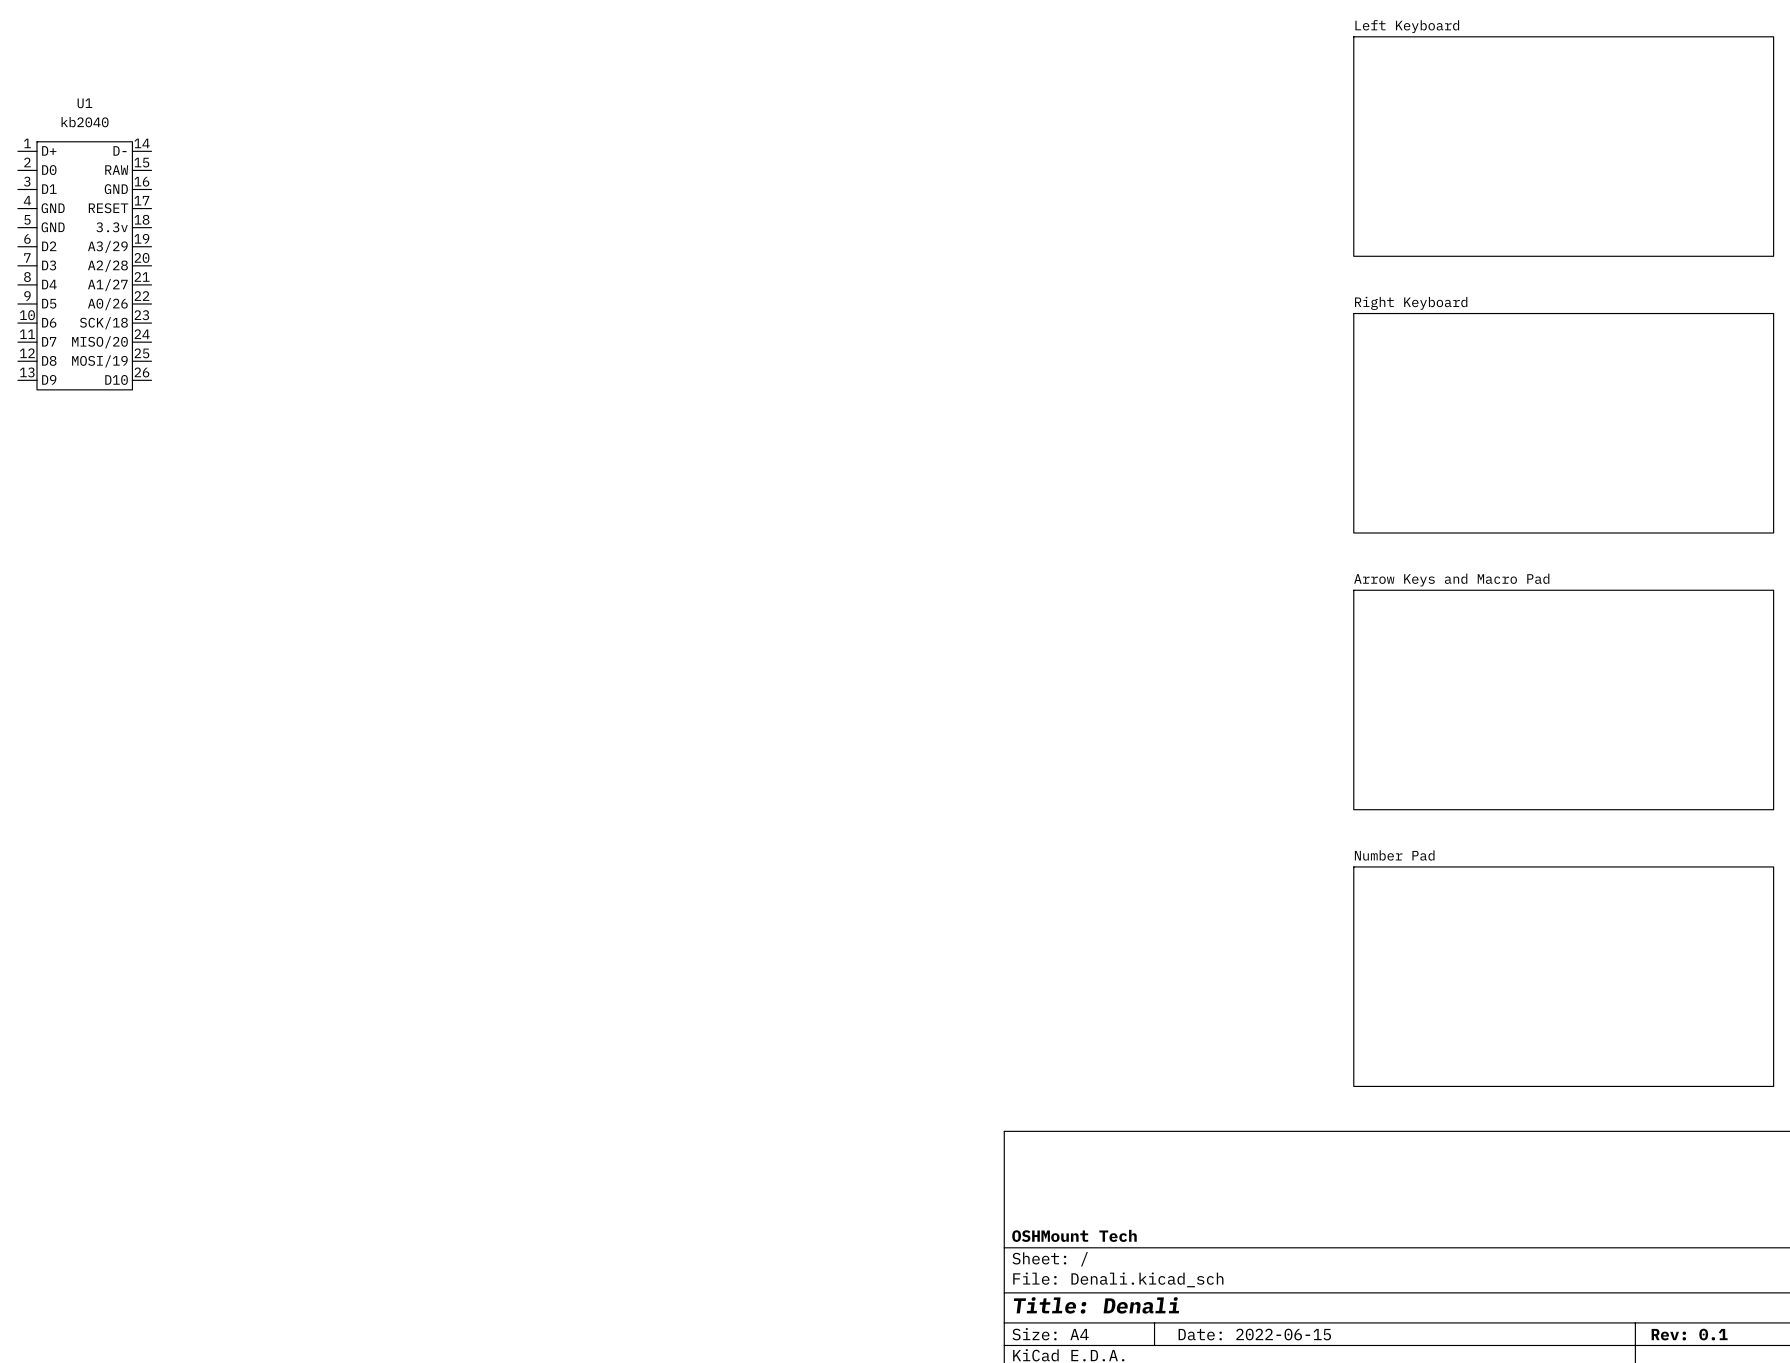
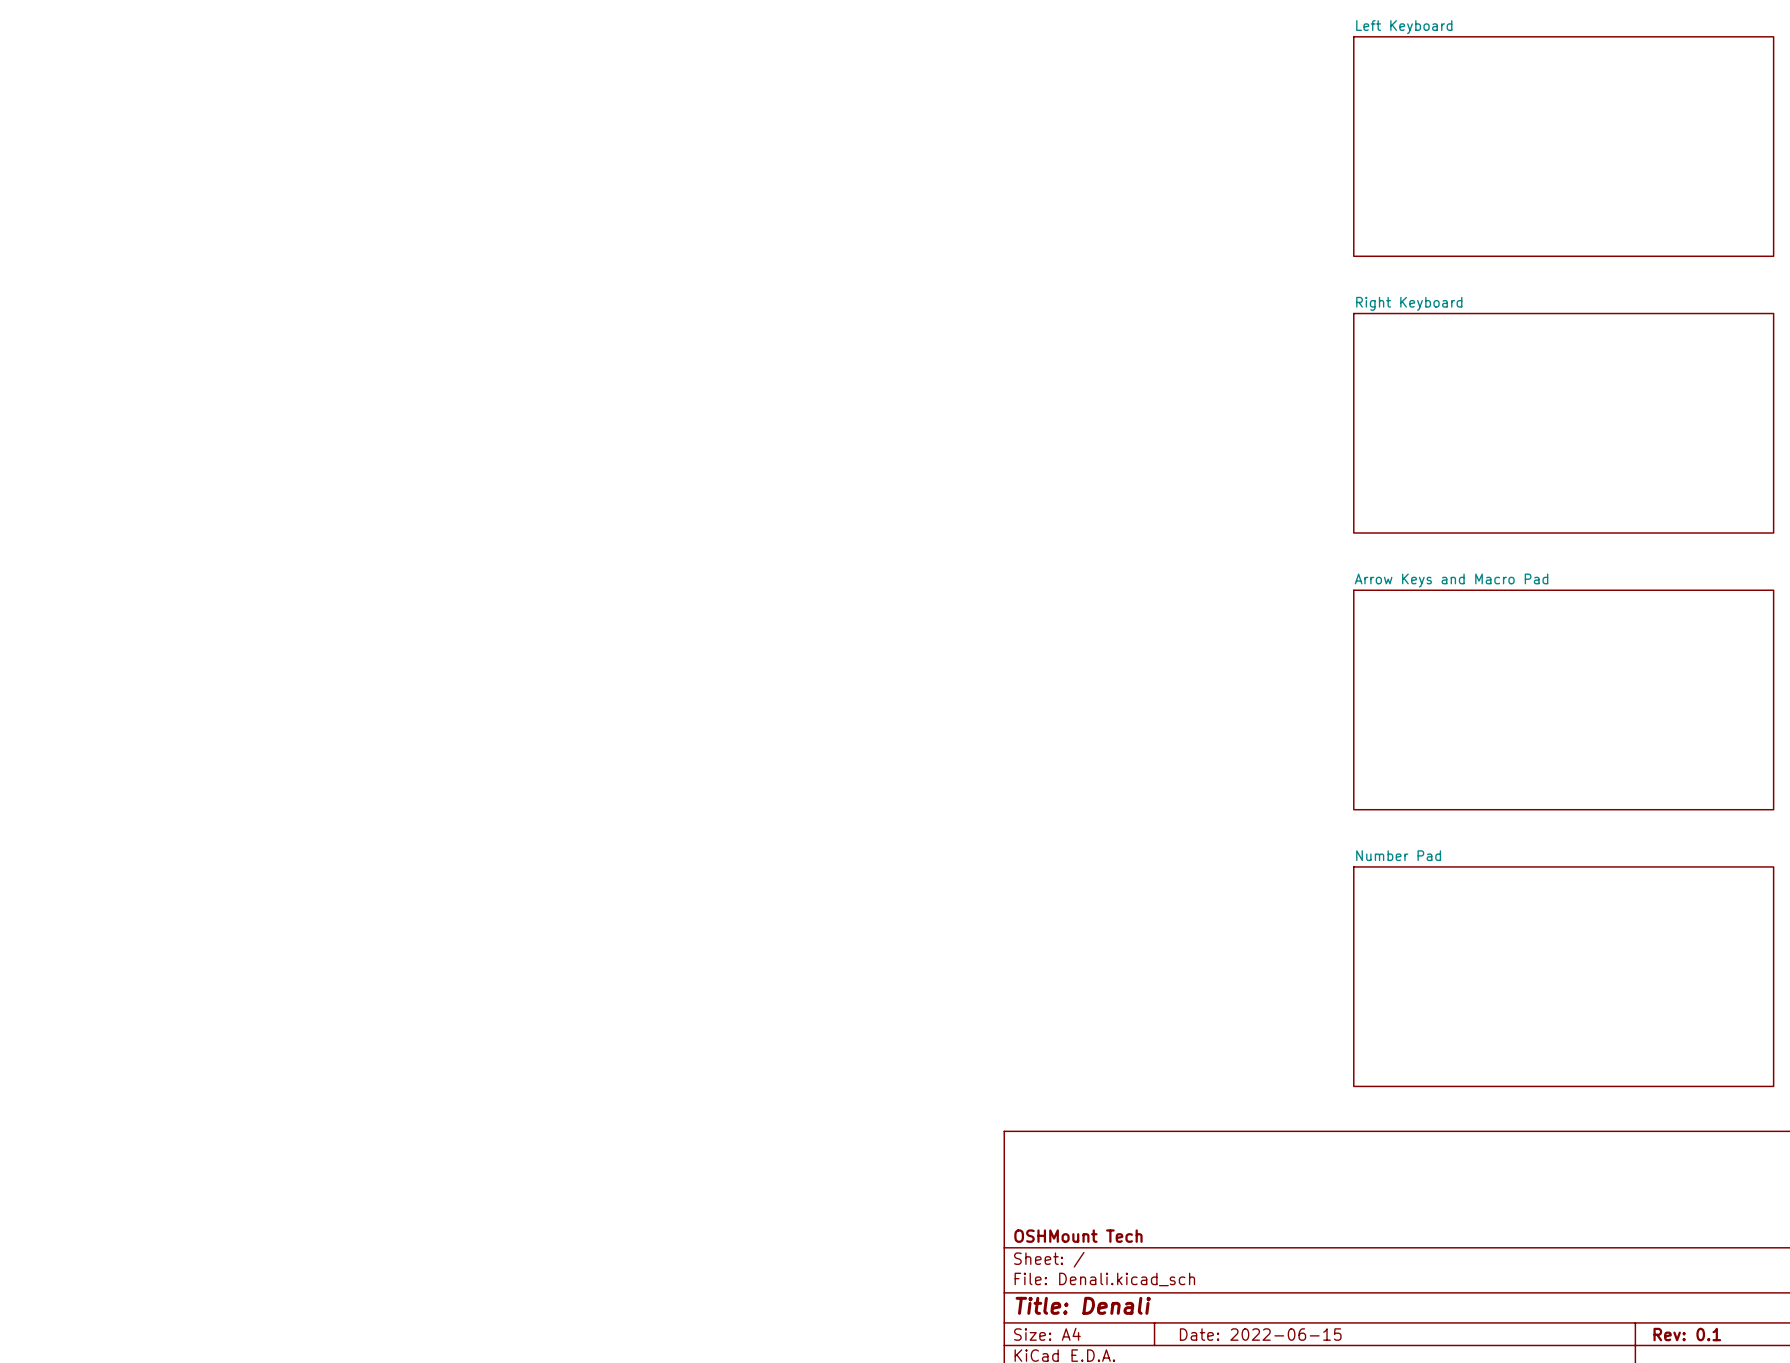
U1: kb2040 (84, 265) -> none

